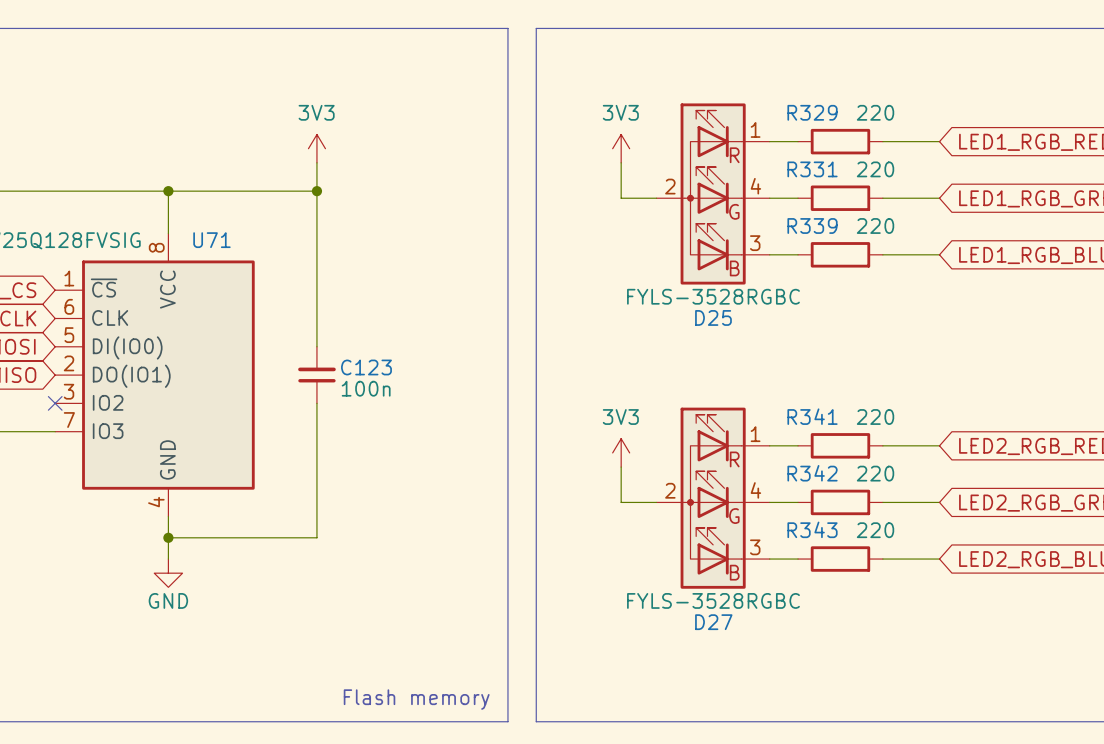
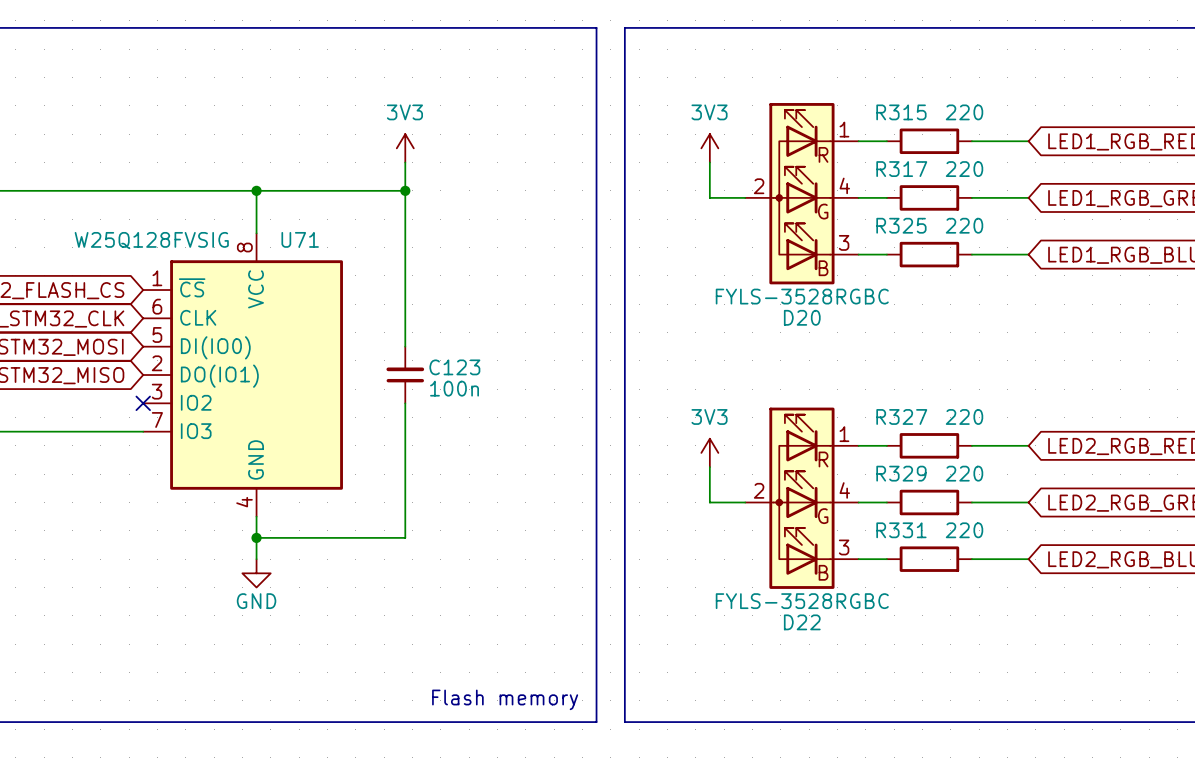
R329 name: R329 (812, 112) -> R315 (901, 112)
R331 name: R331 (812, 169) -> R317 (901, 169)
R339 name: R339 (812, 225) -> R325 (901, 225)
D25 name: D25 (713, 317) -> D20 (802, 317)
R341 name: R341 (812, 416) -> R327 (901, 416)
R342 name: R342 (812, 473) -> R329 (901, 473)
R343 name: R343 (812, 529) -> R331 (901, 530)
D27 name: D27 (713, 622) -> D22 (802, 622)

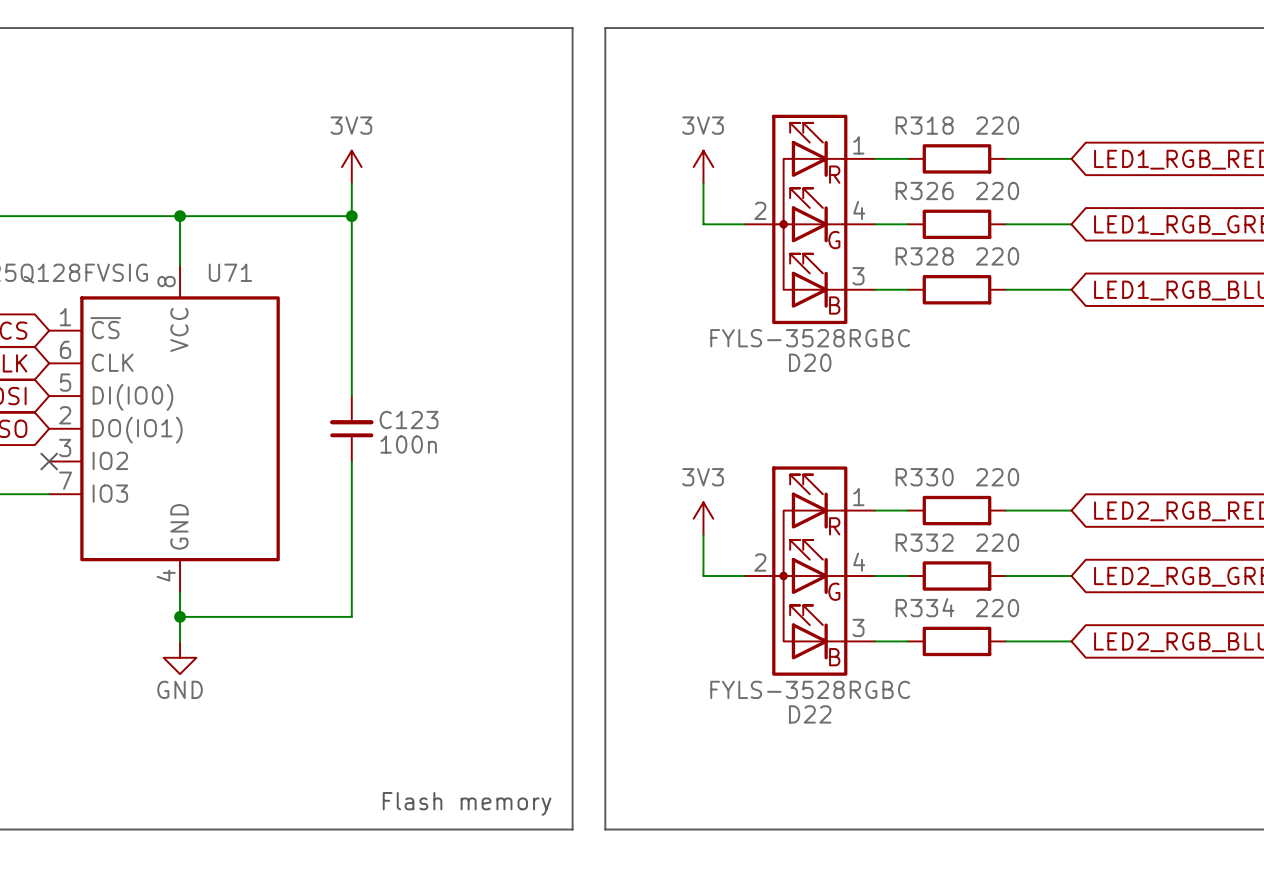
R315 name: R315 (901, 112) -> R318 (924, 125)
R317 name: R317 (901, 169) -> R326 (924, 191)
R325 name: R325 (901, 225) -> R328 (924, 256)
R327 name: R327 (901, 416) -> R330 (924, 477)
R329 name: R329 (901, 473) -> R332 (924, 542)
R331 name: R331 (901, 530) -> R334 (925, 607)

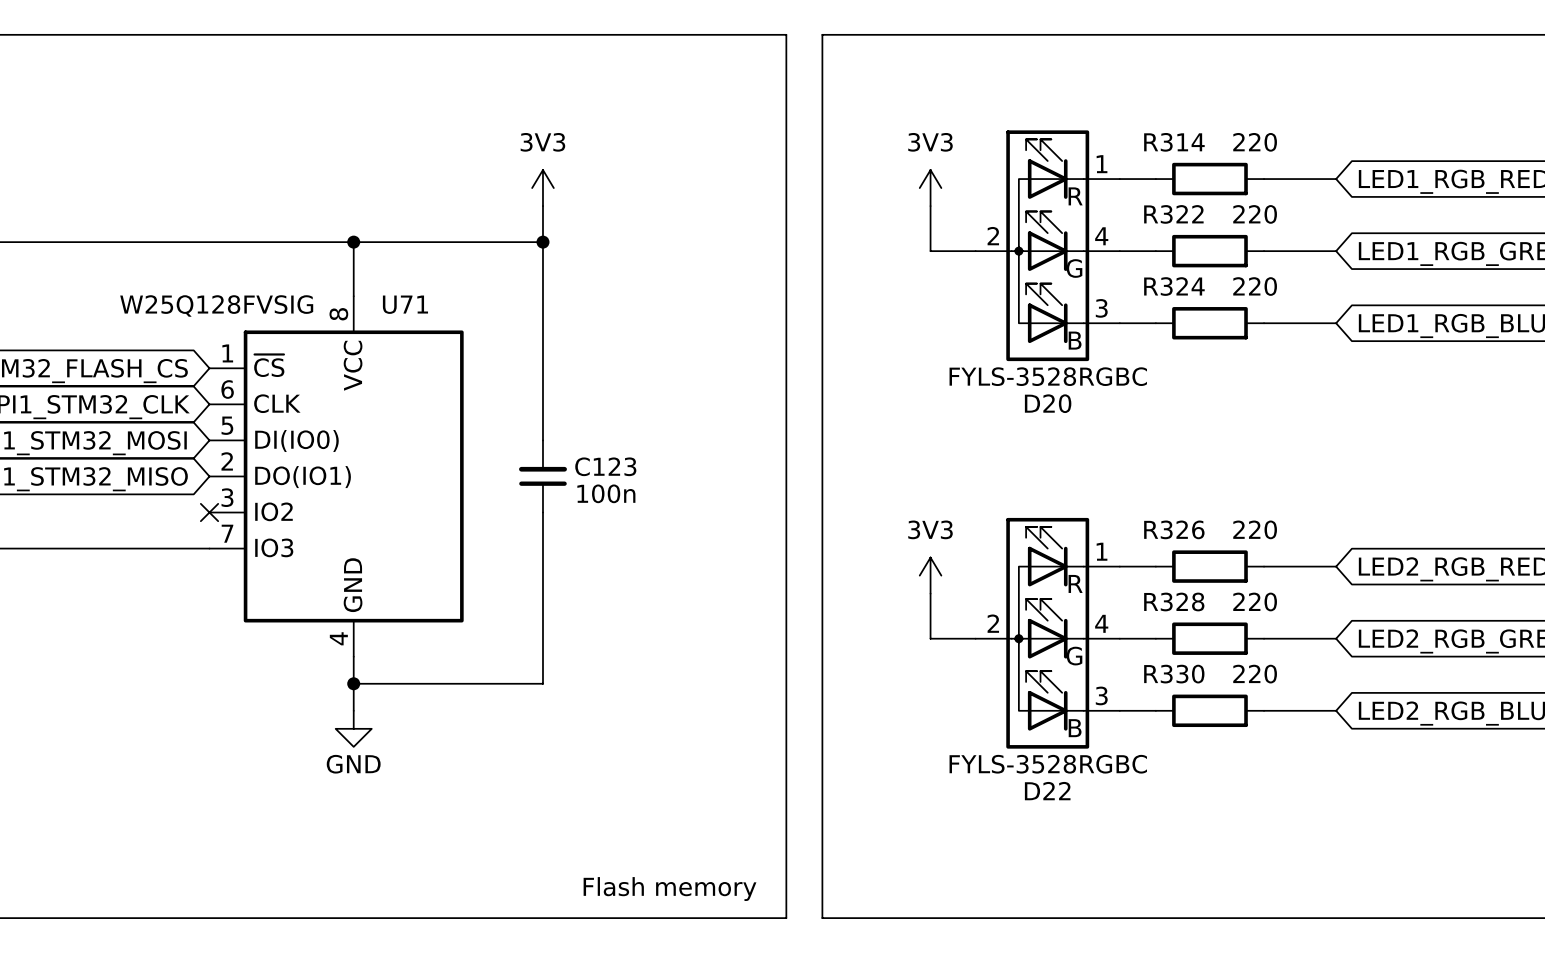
R318 name: R318 (924, 125) -> R314 (1174, 142)
R326 name: R326 (924, 191) -> R322 (1173, 214)
R328 name: R328 (924, 256) -> R324 (1174, 286)
R330 name: R330 (924, 477) -> R326 (1174, 529)
R332 name: R332 (924, 542) -> R328 (1174, 601)
R334 name: R334 (925, 607) -> R330 (1174, 674)

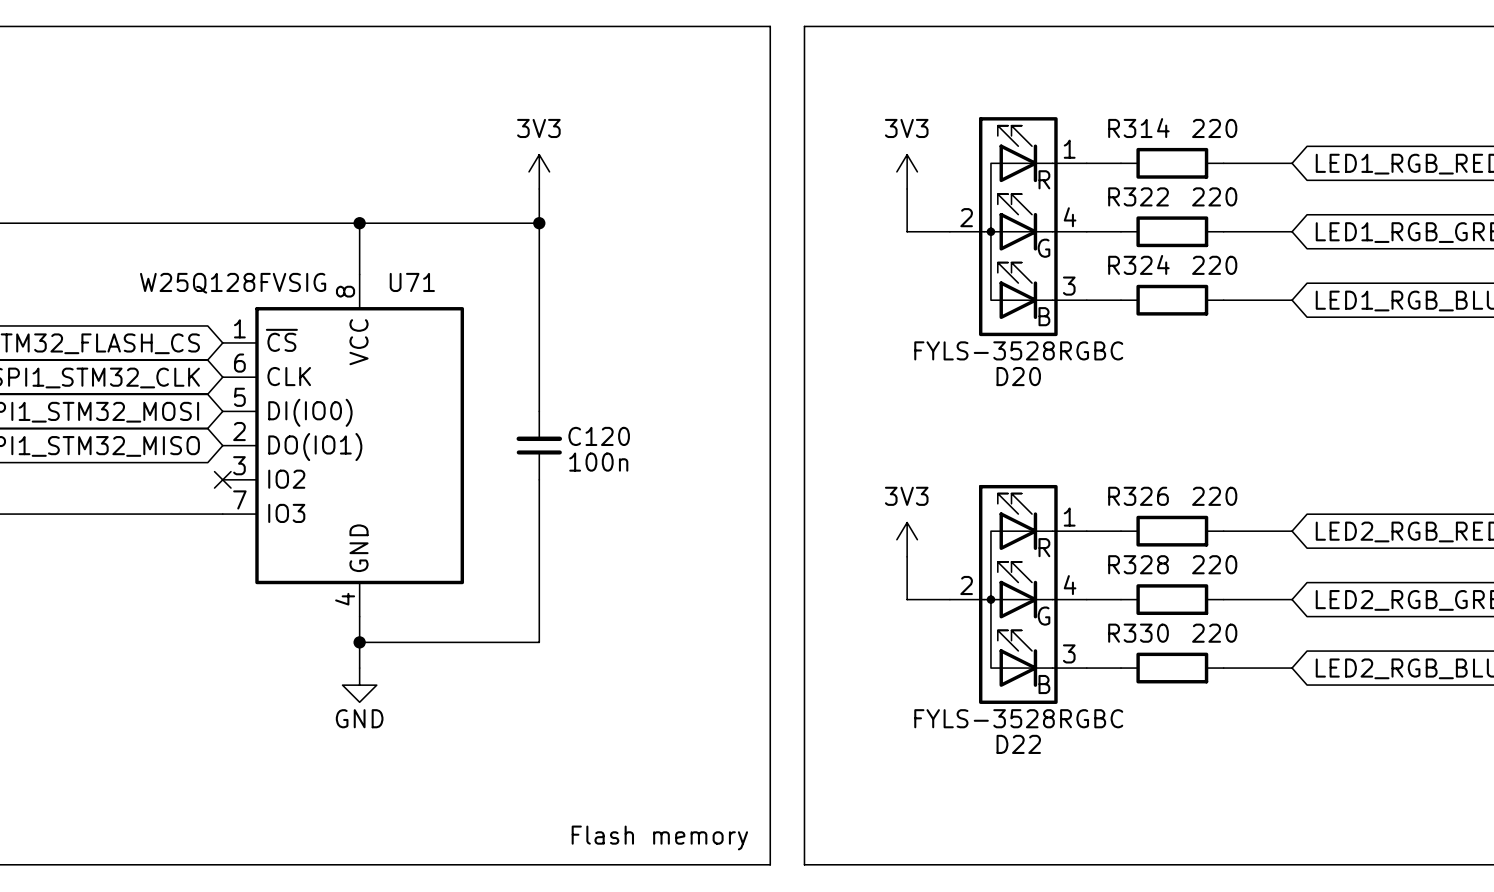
C123 name: C123 (605, 466) -> C120 (599, 436)

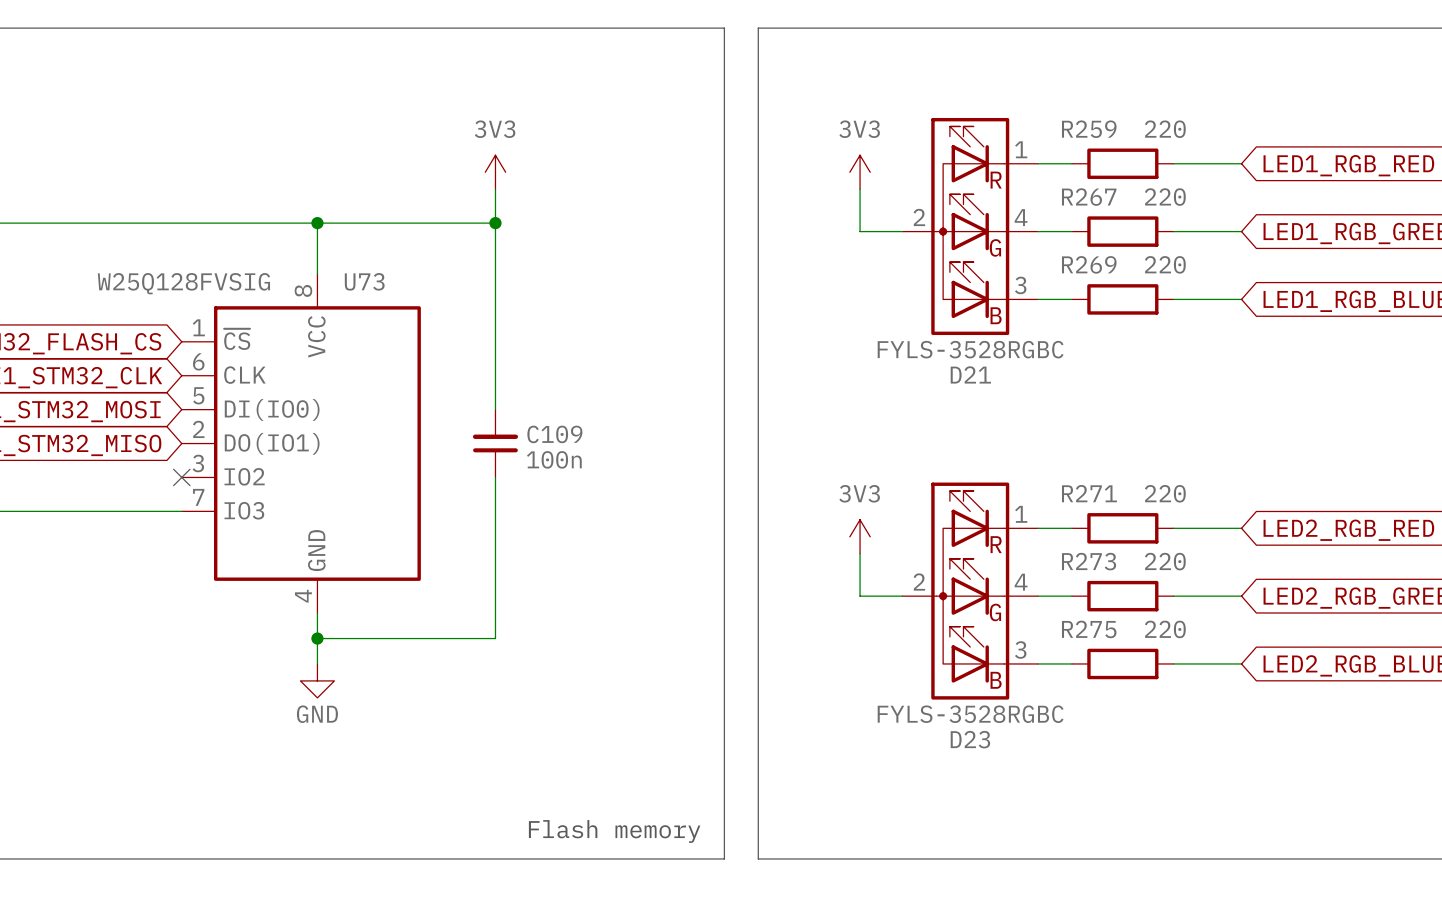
R314 name: R314 (1138, 128) -> R259 (1089, 129)
R322 name: R322 (1138, 196) -> R267 (1089, 197)
R324 name: R324 (1138, 264) -> R269 (1089, 264)
U71 name: U71 (412, 282) -> U73 (364, 281)
D20 name: D20 (1018, 376) -> D21 (970, 374)
C120 name: C120 (599, 436) -> C109 (554, 434)
R326 name: R326 (1138, 496) -> R271 (1089, 493)
R328 name: R328 (1138, 564) -> R273 (1089, 561)
R330 name: R330 (1138, 633) -> R275 (1089, 629)
D22 name: D22 (1018, 744) -> D23 (970, 739)

